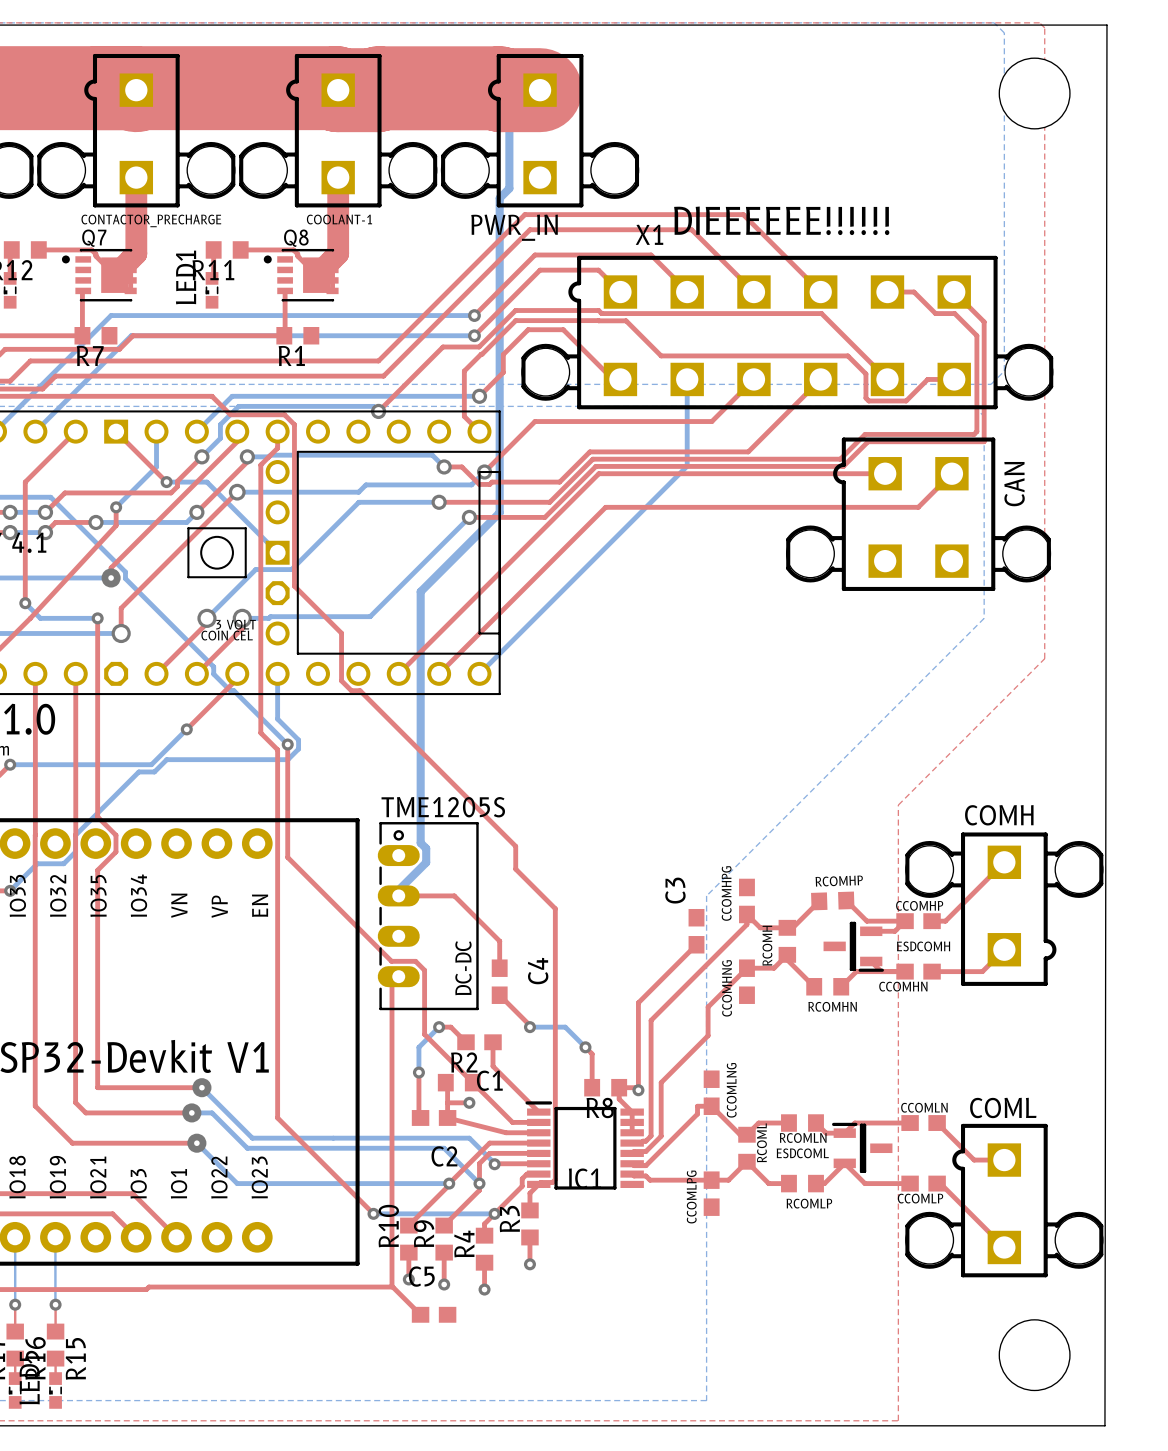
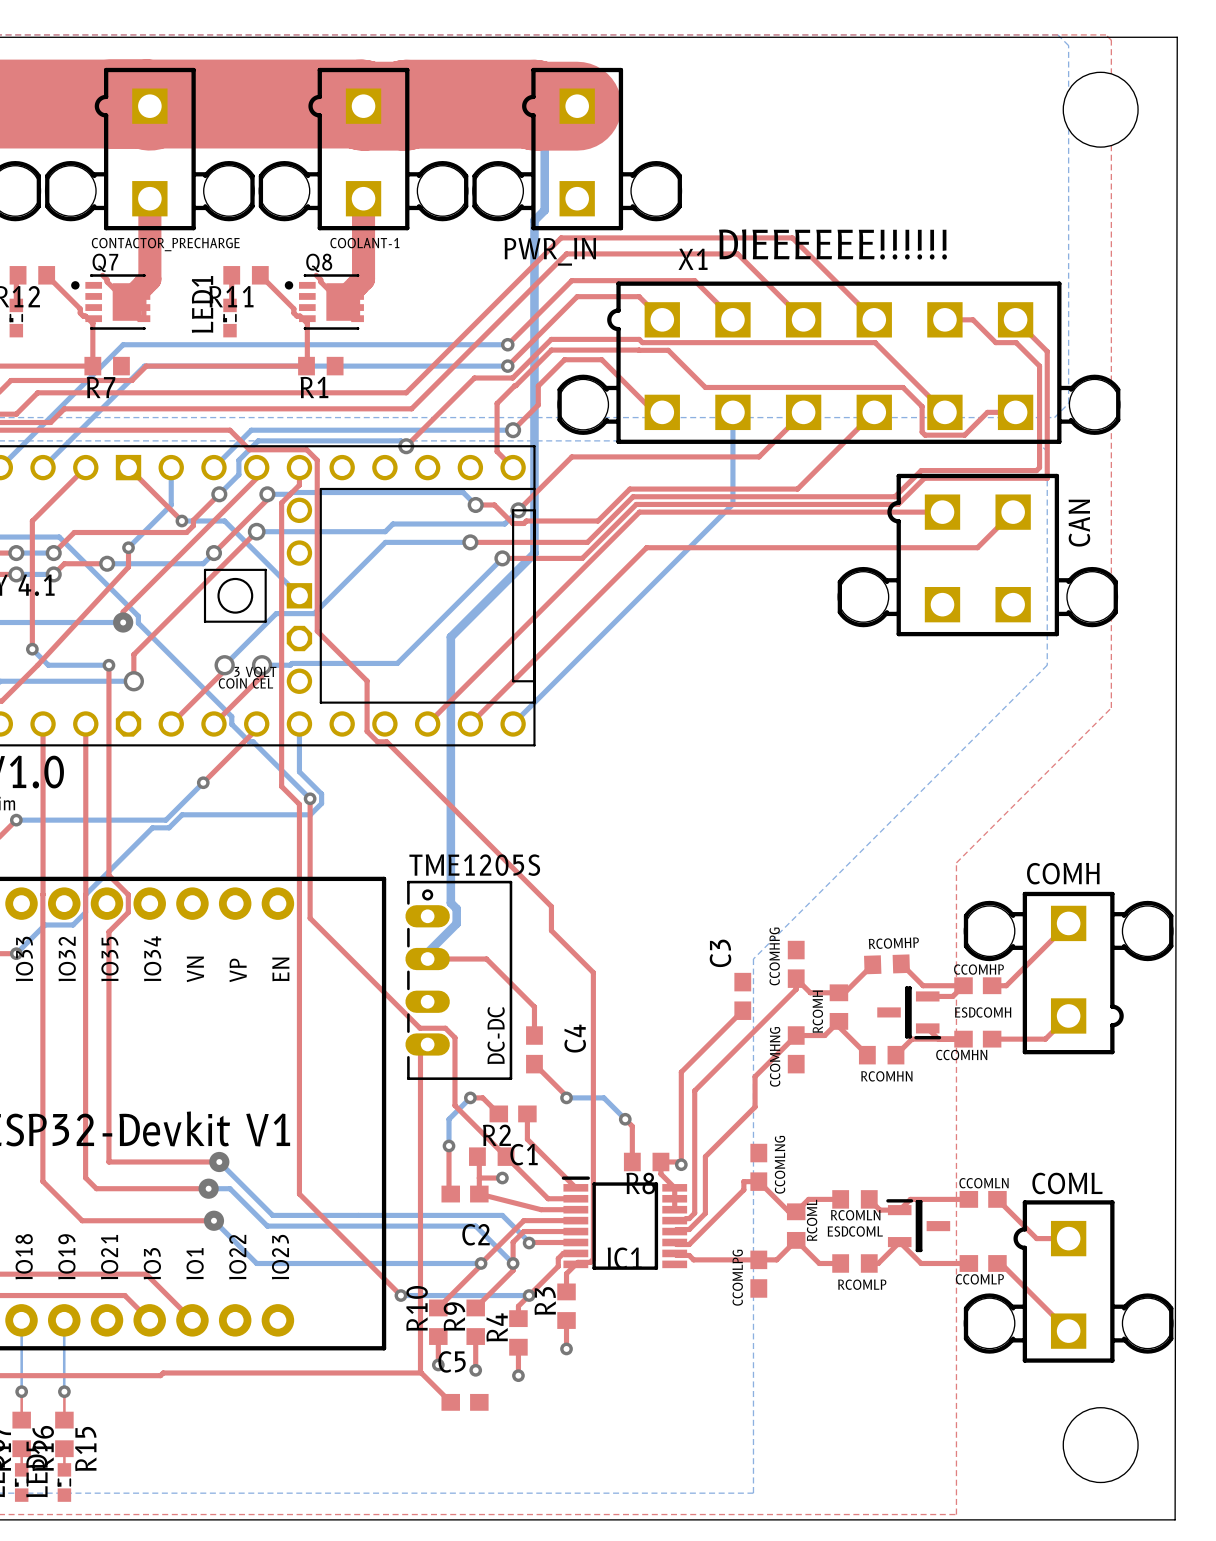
top track: (38, 249) (91, 249) -> (46, 275) (80, 308) (80, 313) (92, 323)
top track: (240, 249) (293, 249) -> (260, 275) (293, 308) (293, 313) (307, 323)

